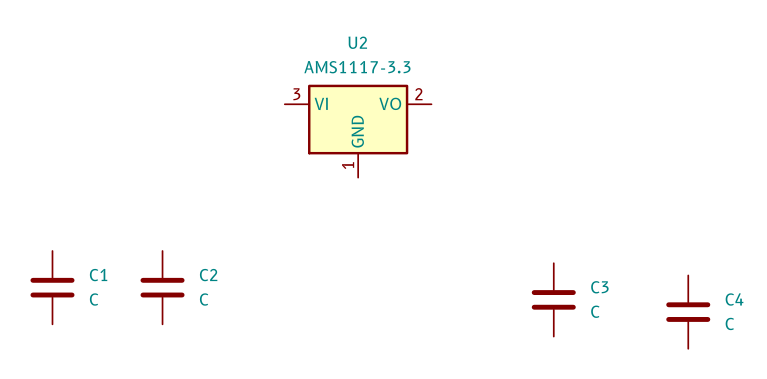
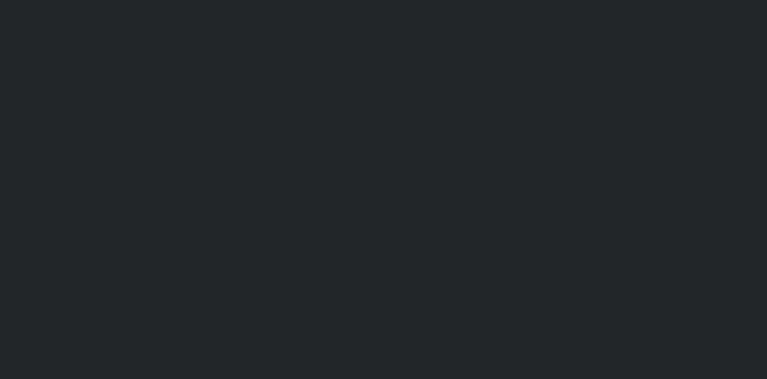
U2: AMS1117-3.3 (358, 131) -> none
C1: C (52, 287) -> none
C2: C (162, 287) -> none
C3: C (553, 299) -> none
C4: C (688, 312) -> none

